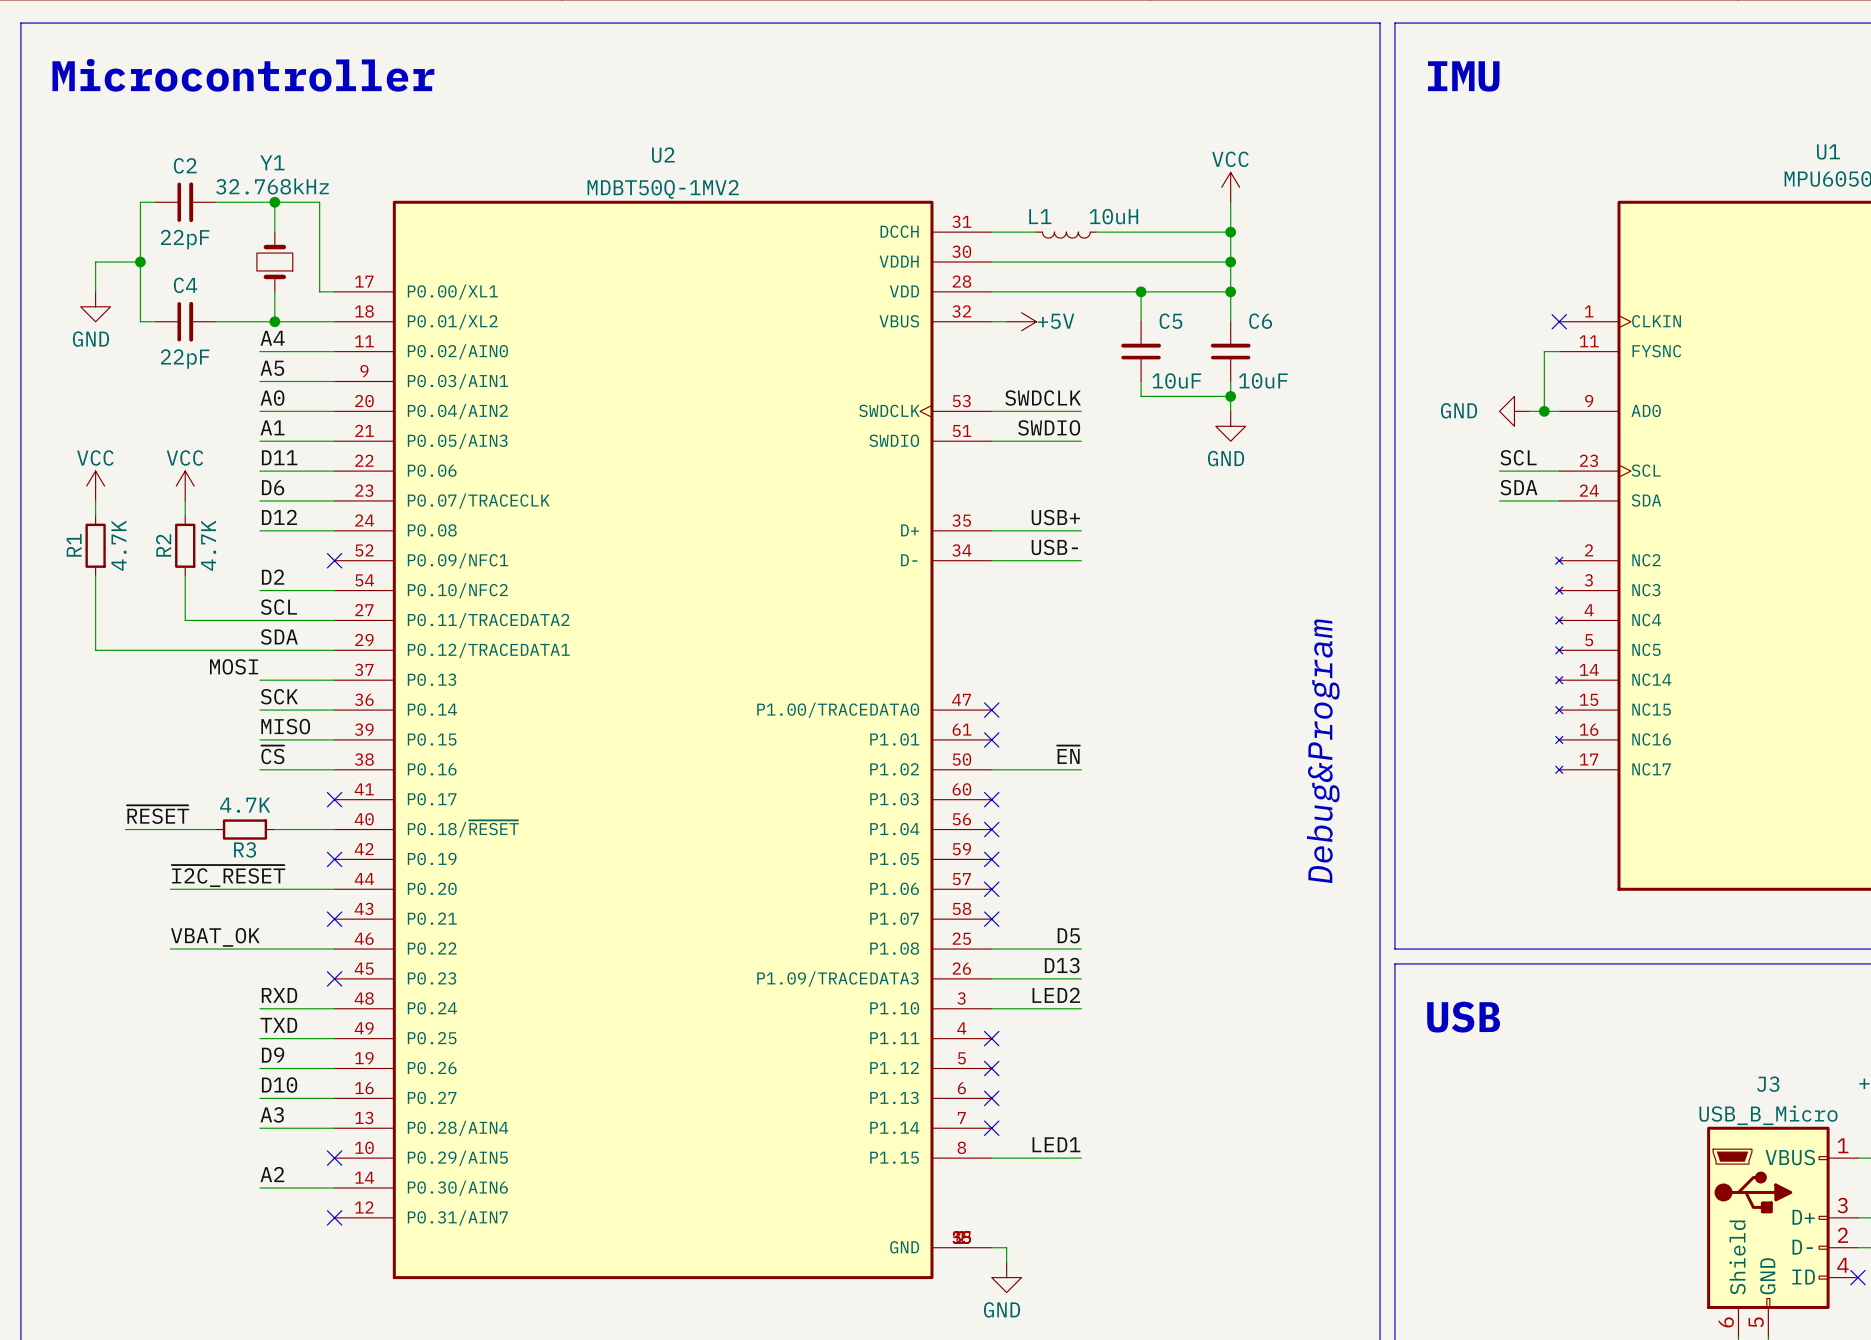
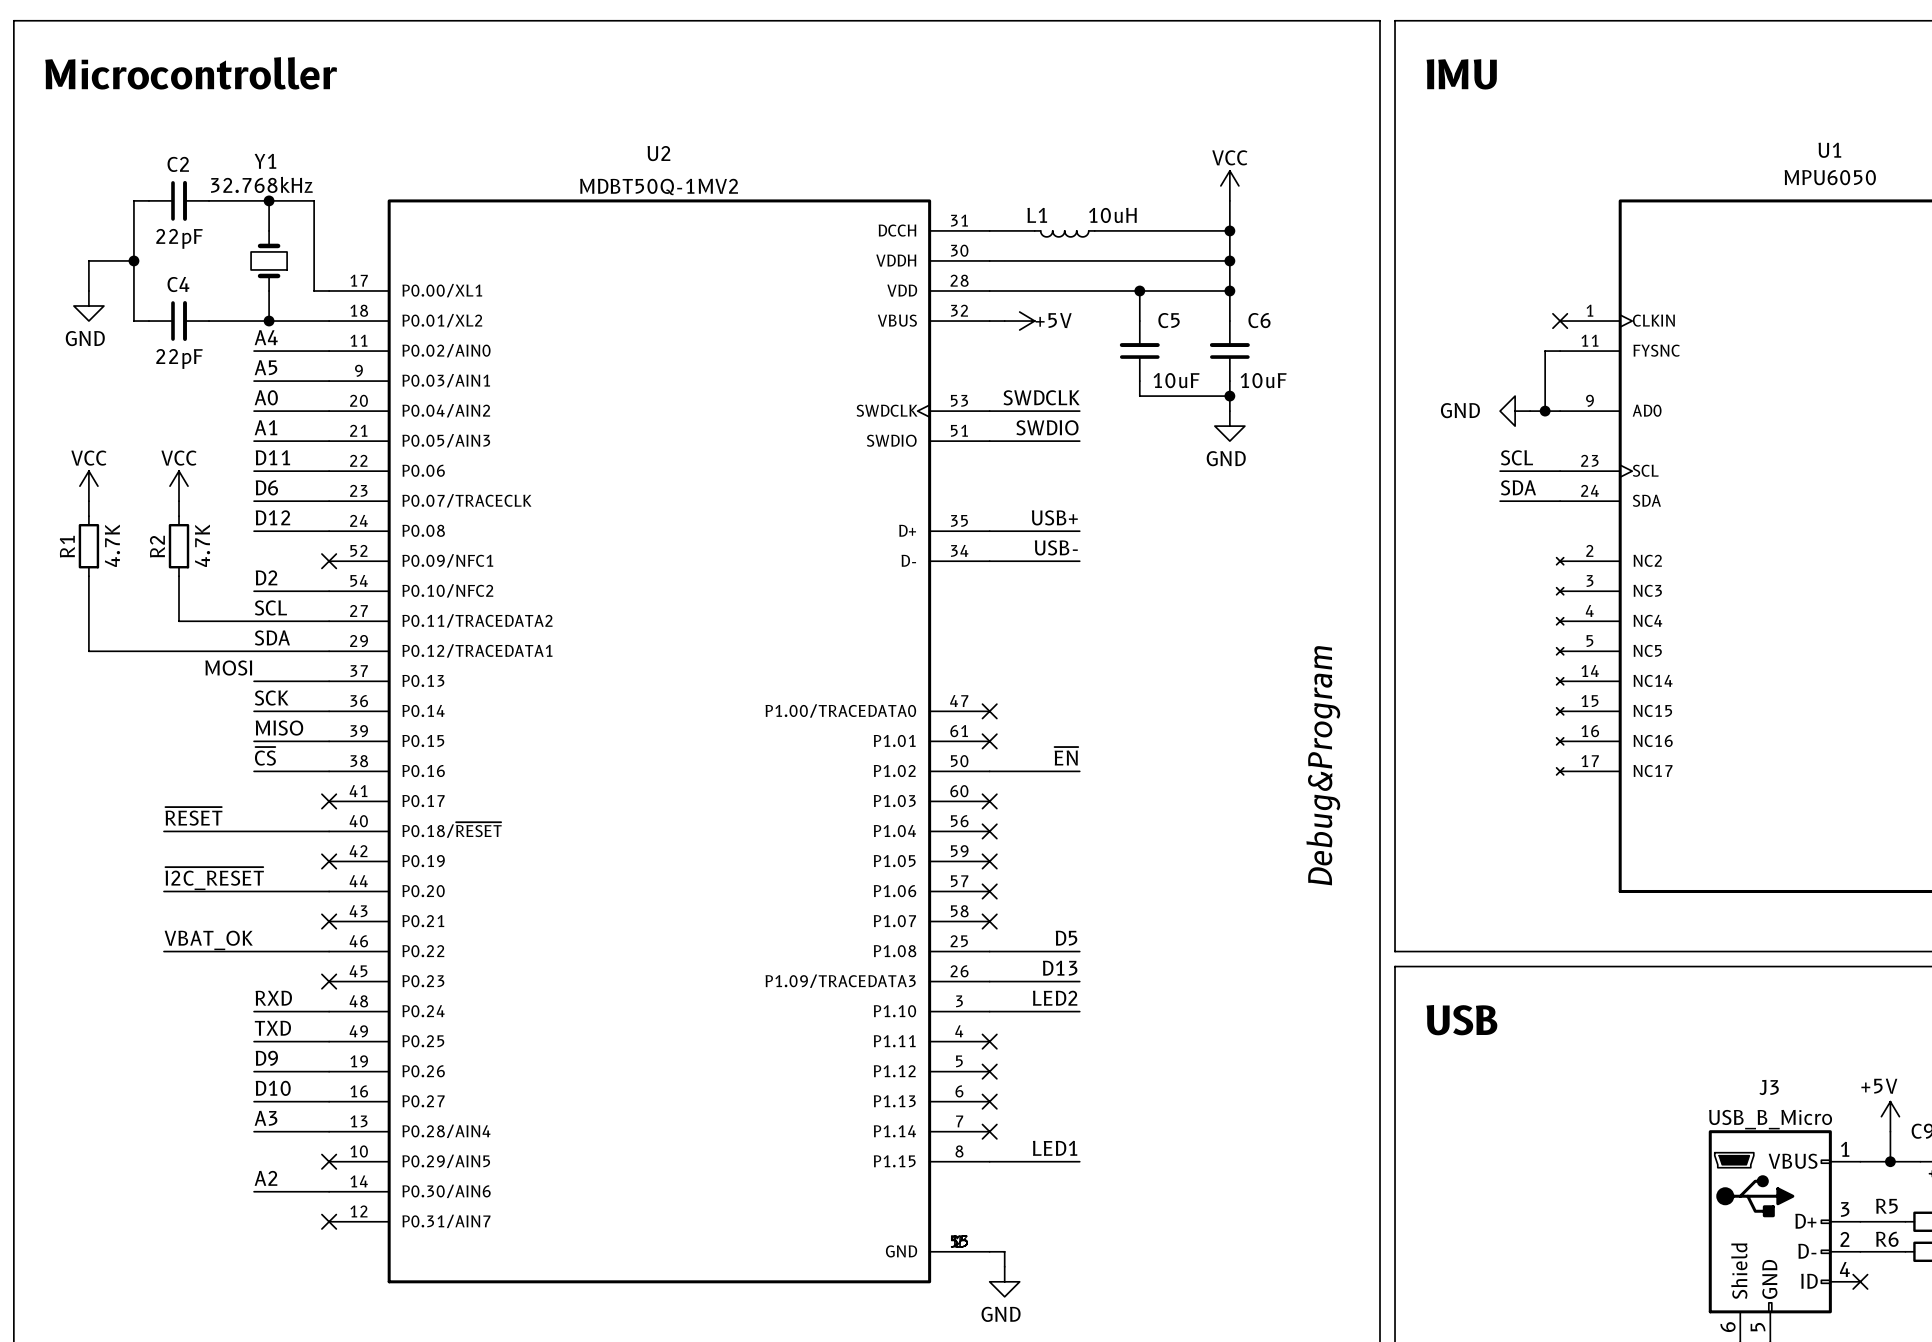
label position: ~{RESET} (158, 814) -> ~{RESET} (193, 816)
wire: (125, 829) (170, 829) -> none
wire: none -> (209, 831) (269, 831)
R3: 4.7K (244, 829) -> none

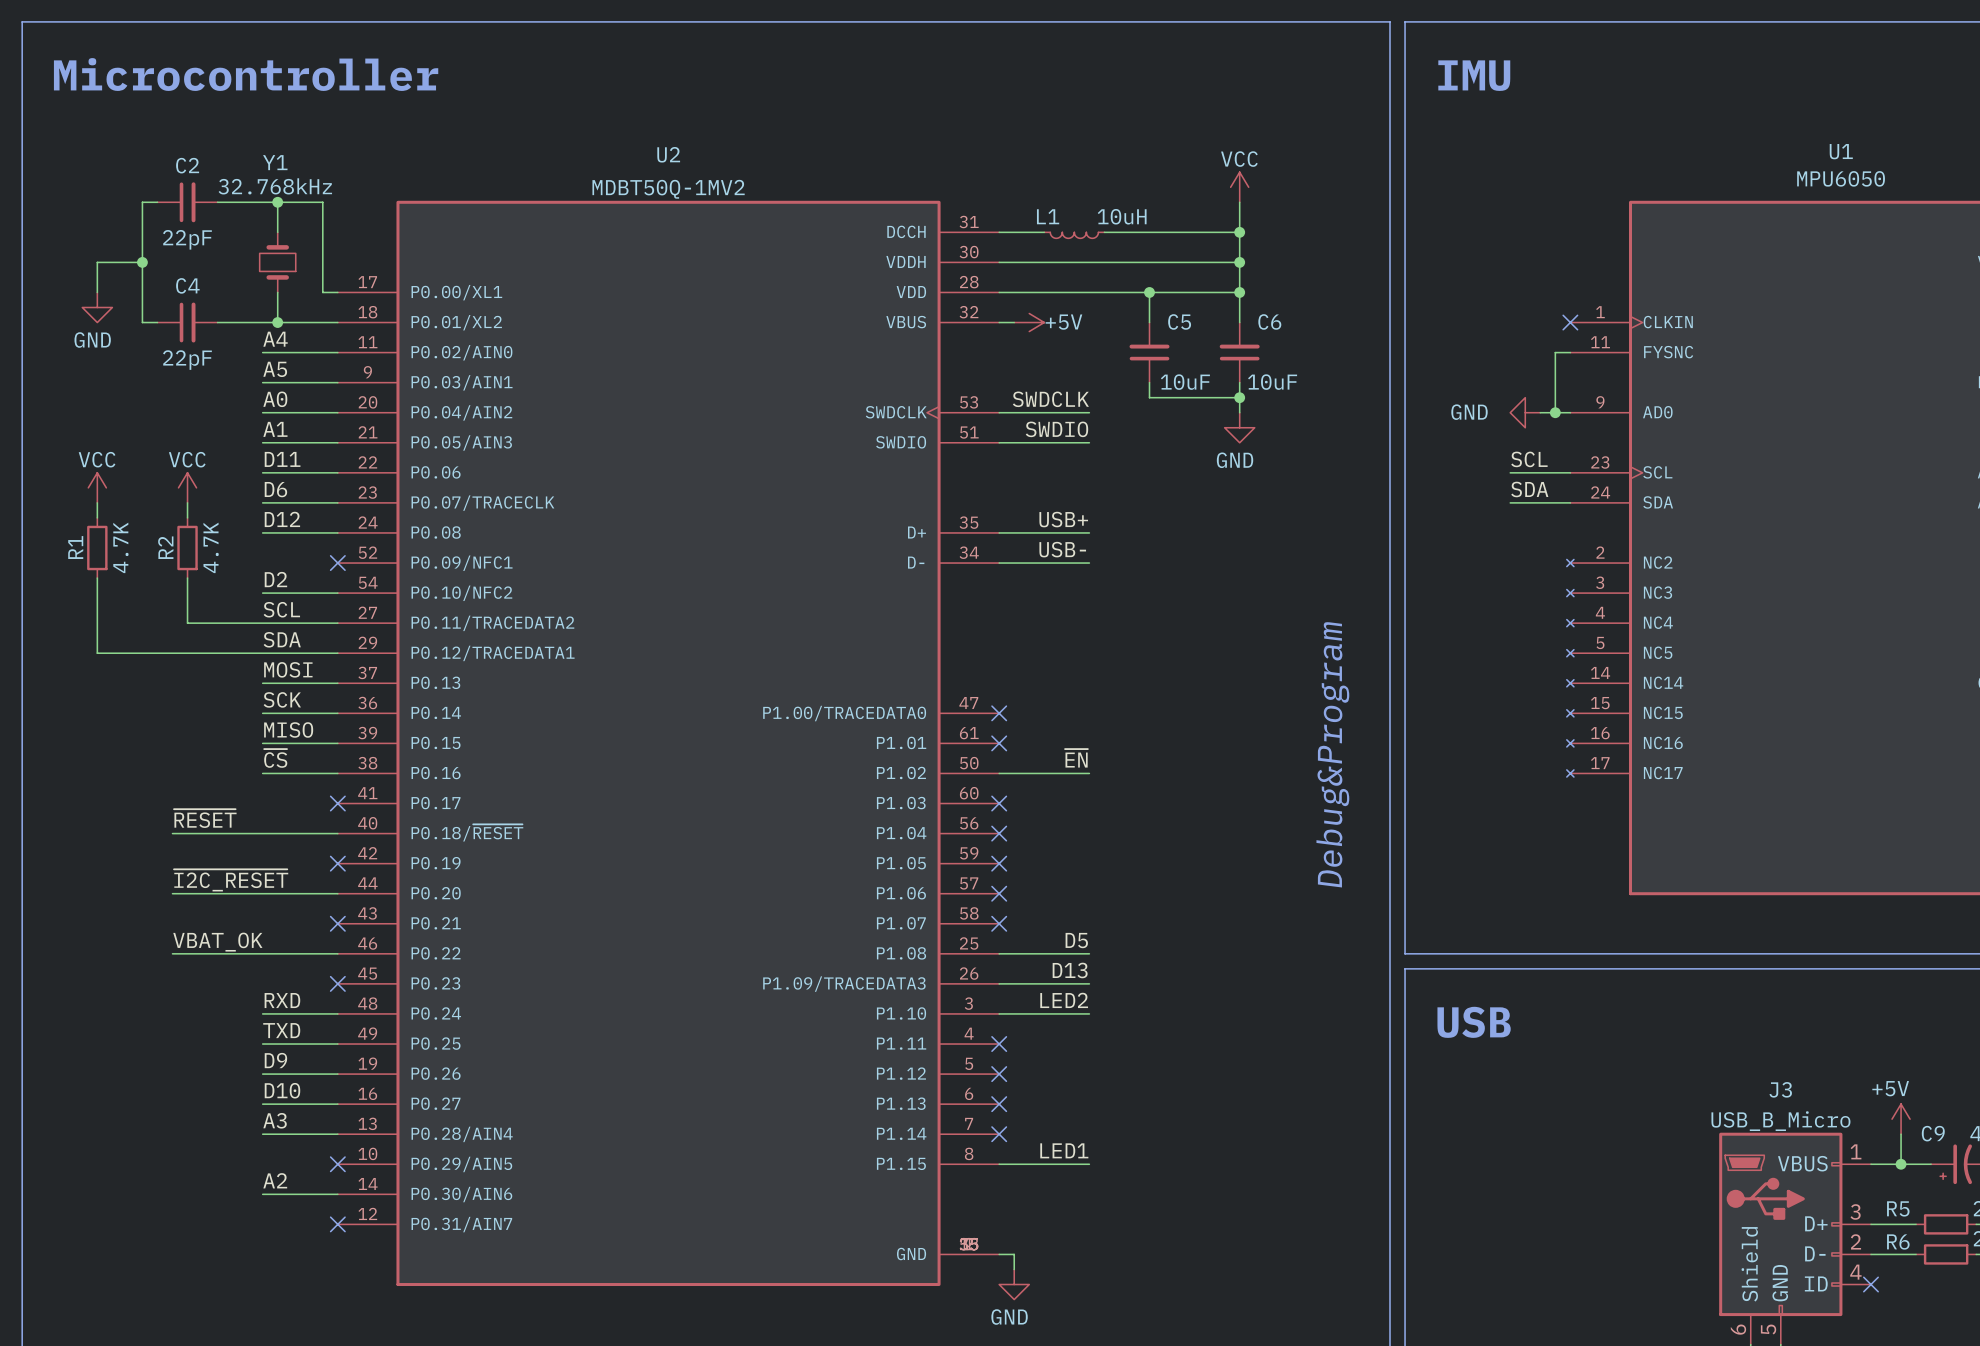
label position: MOSI (228, 668) -> MOSI (288, 669)

